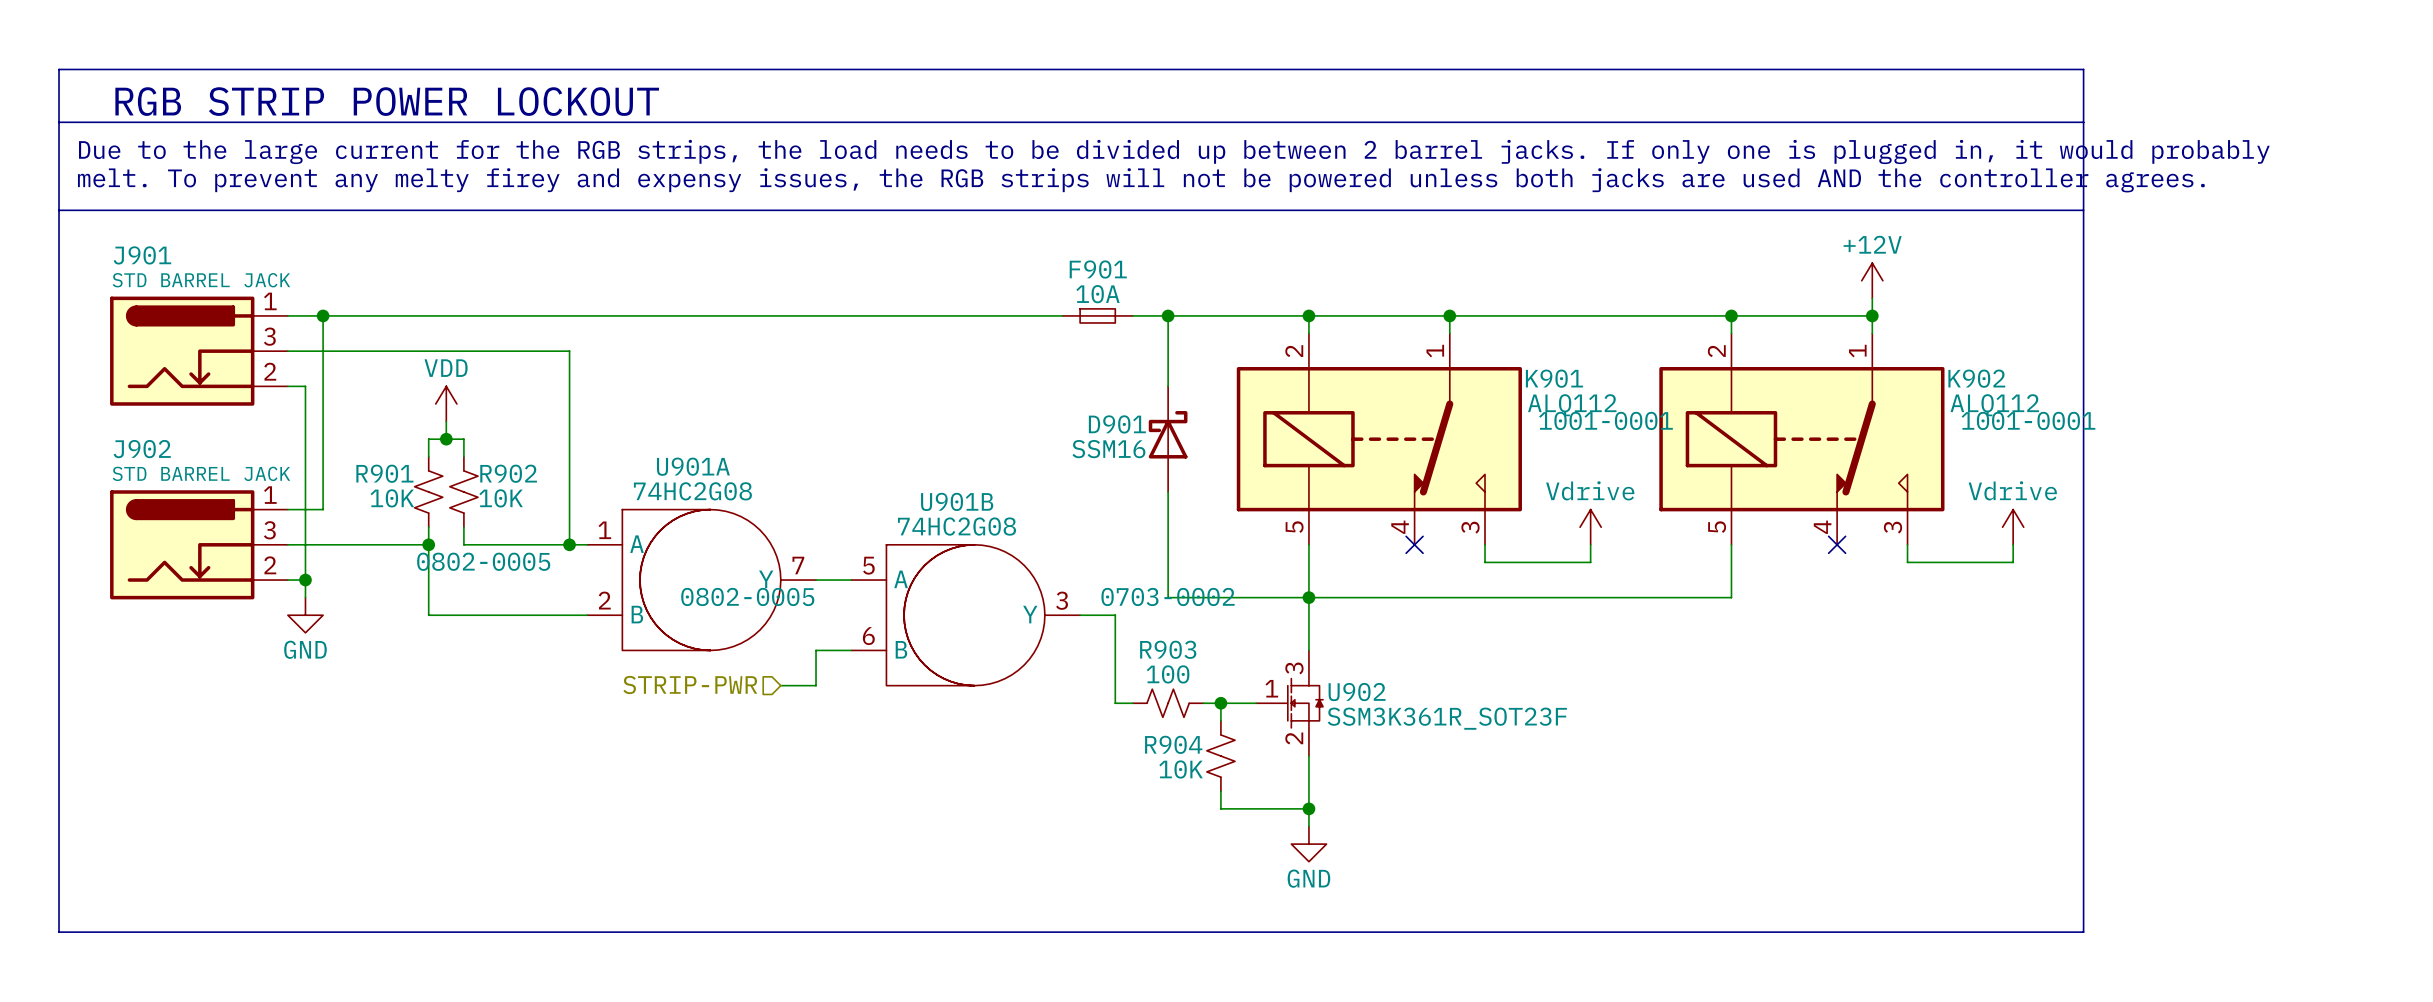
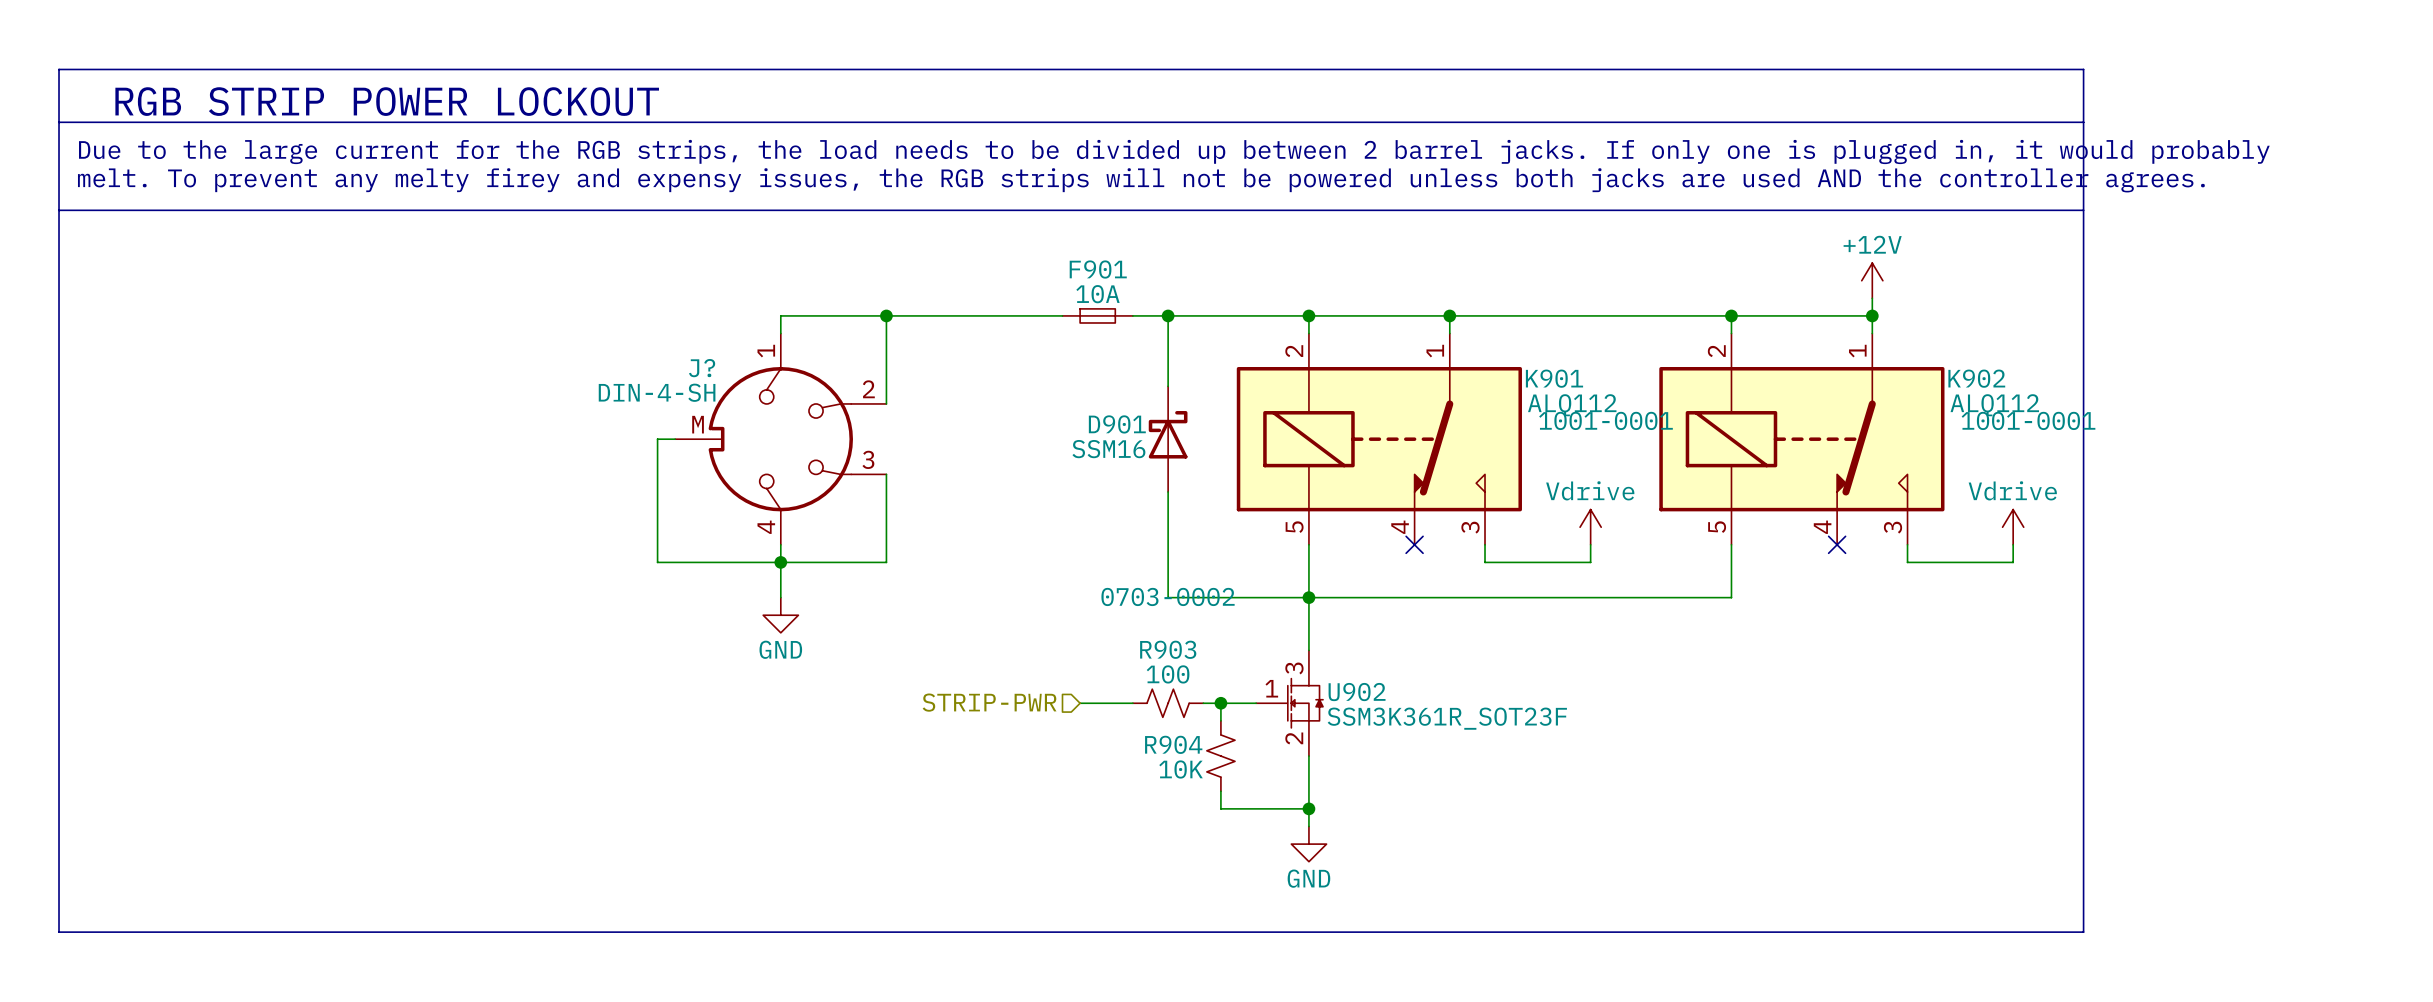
wire: (287, 315) (780, 315) -> (780, 333) (780, 315)
wire: (323, 315) (323, 509) (287, 509) -> none
junction: (323, 315) -> none
wire: none -> (886, 315) (886, 403)
junction: none -> (886, 315)
J901: STD BARREL JACK (198, 351) -> none
wire: (287, 351) (569, 351) (569, 544) -> none
wire: (287, 386) (305, 386) (305, 597) -> none
power symbol: VDD (446, 403) -> none
wire: (446, 421) (446, 439) -> none
junction: (446, 439) -> none
wire: none -> (675, 439) (657, 439) (657, 562) (886, 562) (886, 474)
J?: none -> DIN-4-SH (780, 439)
wire: (428, 456) (428, 439) (463, 439) (463, 456) -> none
R901: 10K (428, 492) -> none
R902: 10K (463, 492) -> none
wire: (428, 527) (428, 615) (587, 615) -> none
wire: (463, 527) (463, 544) (587, 544) -> none
J902: STD BARREL JACK (198, 544) -> none
wire: (287, 544) (428, 544) -> none
junction: (428, 544) -> none
junction: (569, 544) -> none
wire: none -> (780, 544) (780, 597)
junction: none -> (780, 562)
wire: (287, 580) (305, 580) -> none
junction: (305, 580) -> none
U901A: 74HC2G08 (701, 580) -> none
wire: (816, 580) (851, 580) -> none
power symbol: GND (305, 615) -> none
power symbol: none -> GND (780, 615)
U901B: 74HC2G08 (965, 615) -> none
wire: (1080, 615) (1115, 615) (1115, 703) -> (1080, 703) (1115, 703)
wire: (851, 650) (816, 650) (816, 685) (780, 685) -> none
hierarchical label position: STRIP-PWR (690, 684) -> STRIP-PWR (989, 702)

